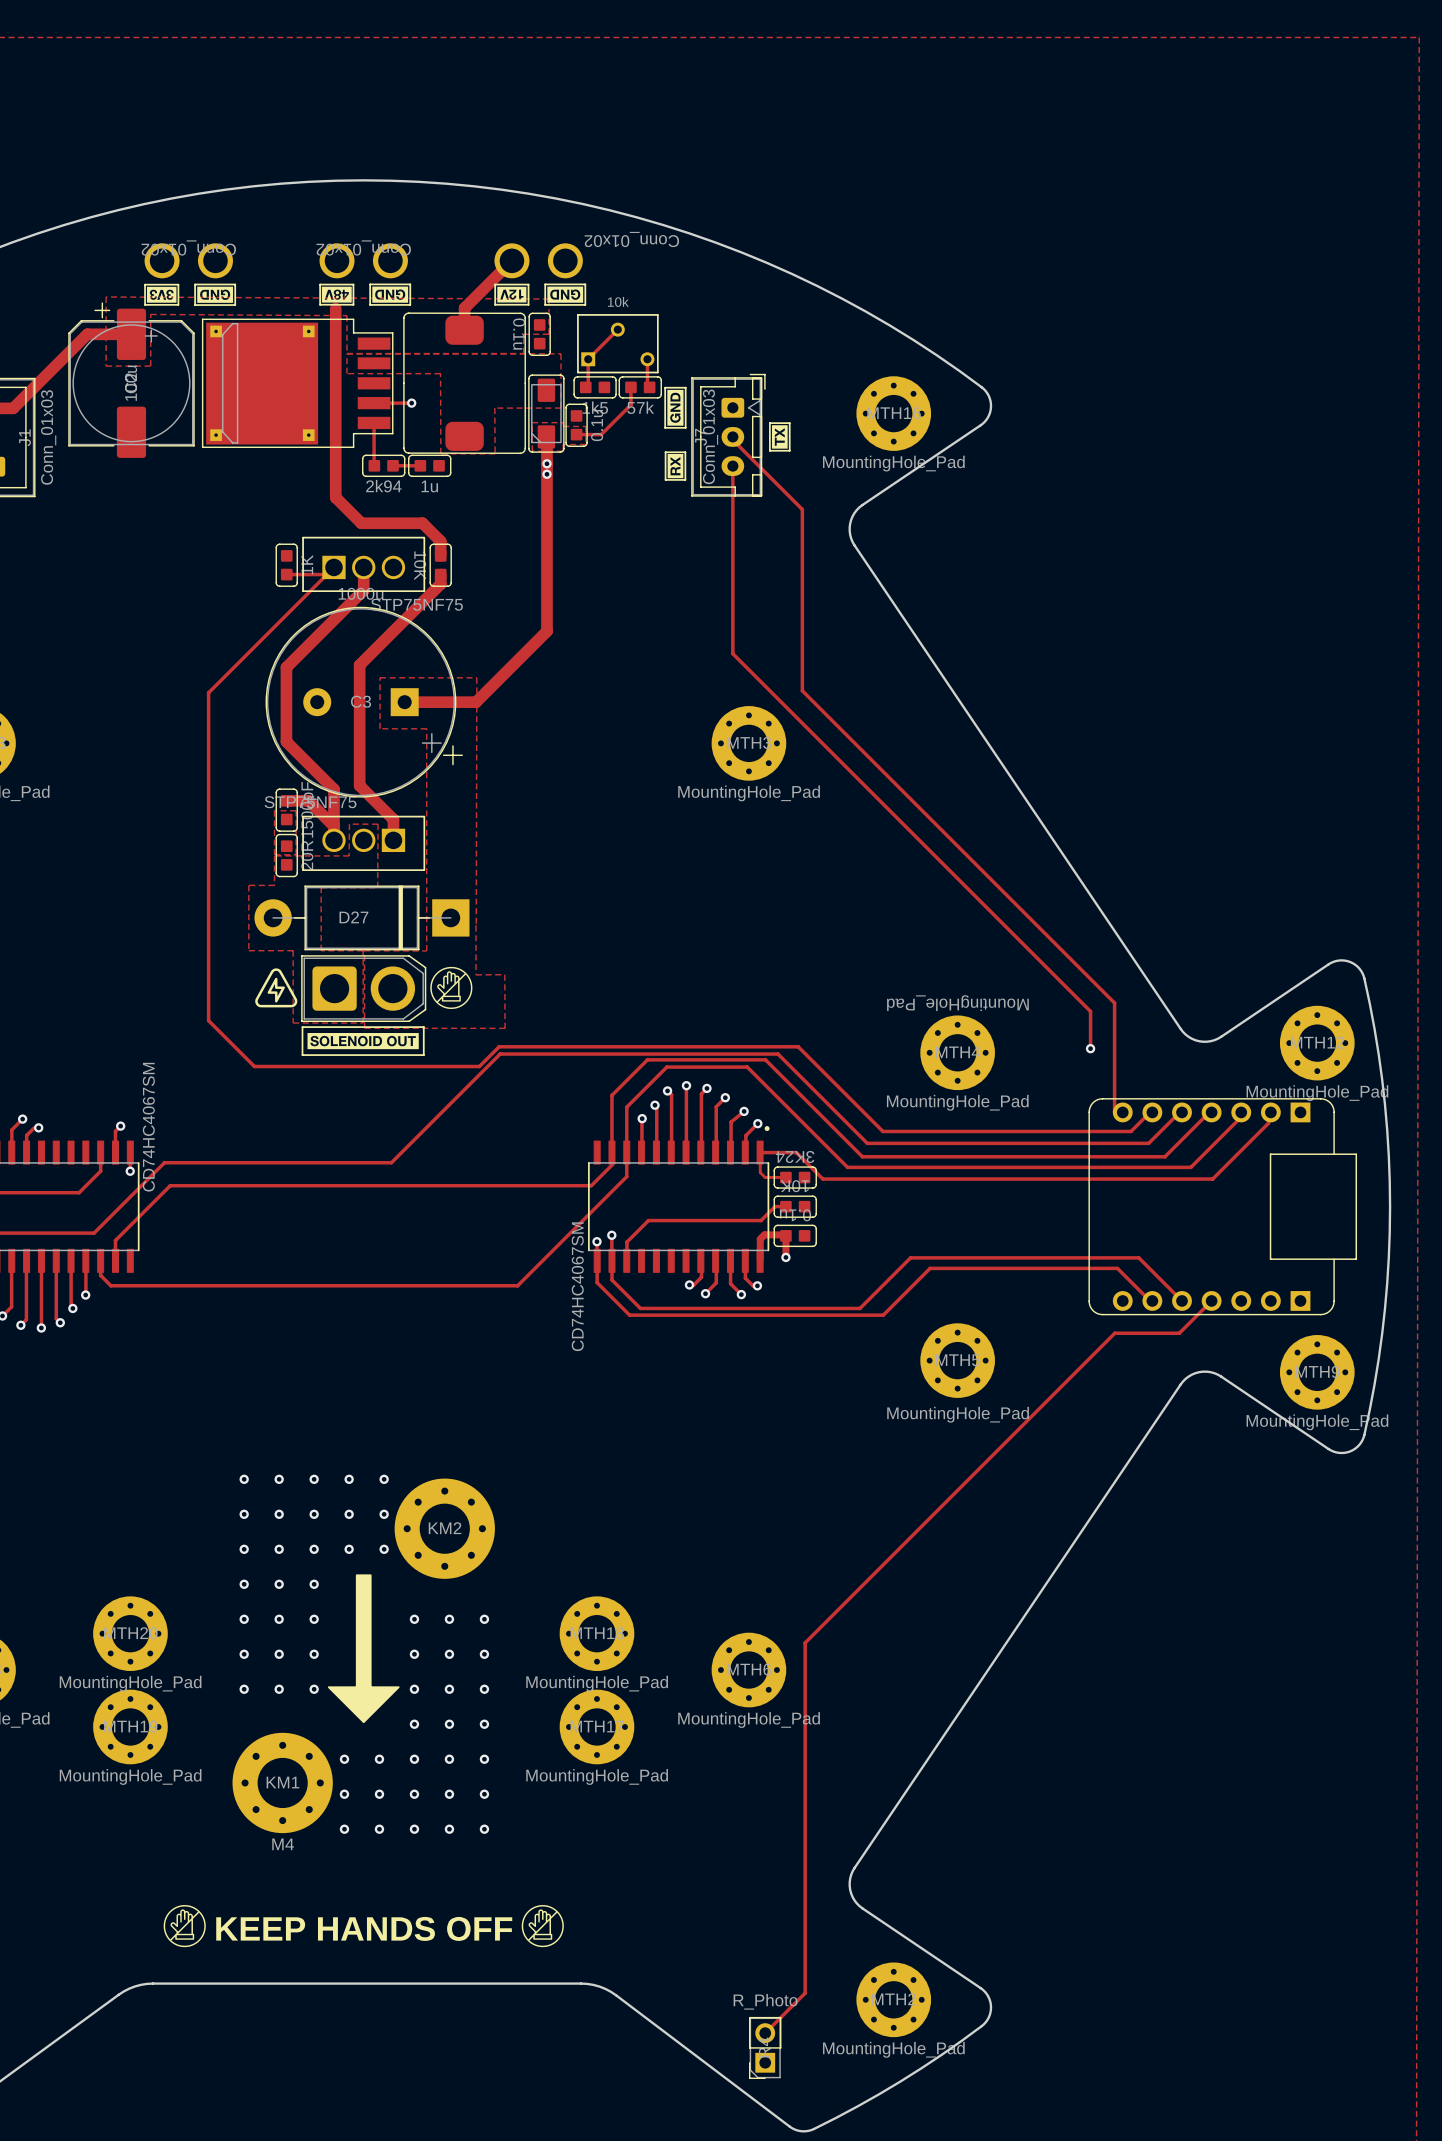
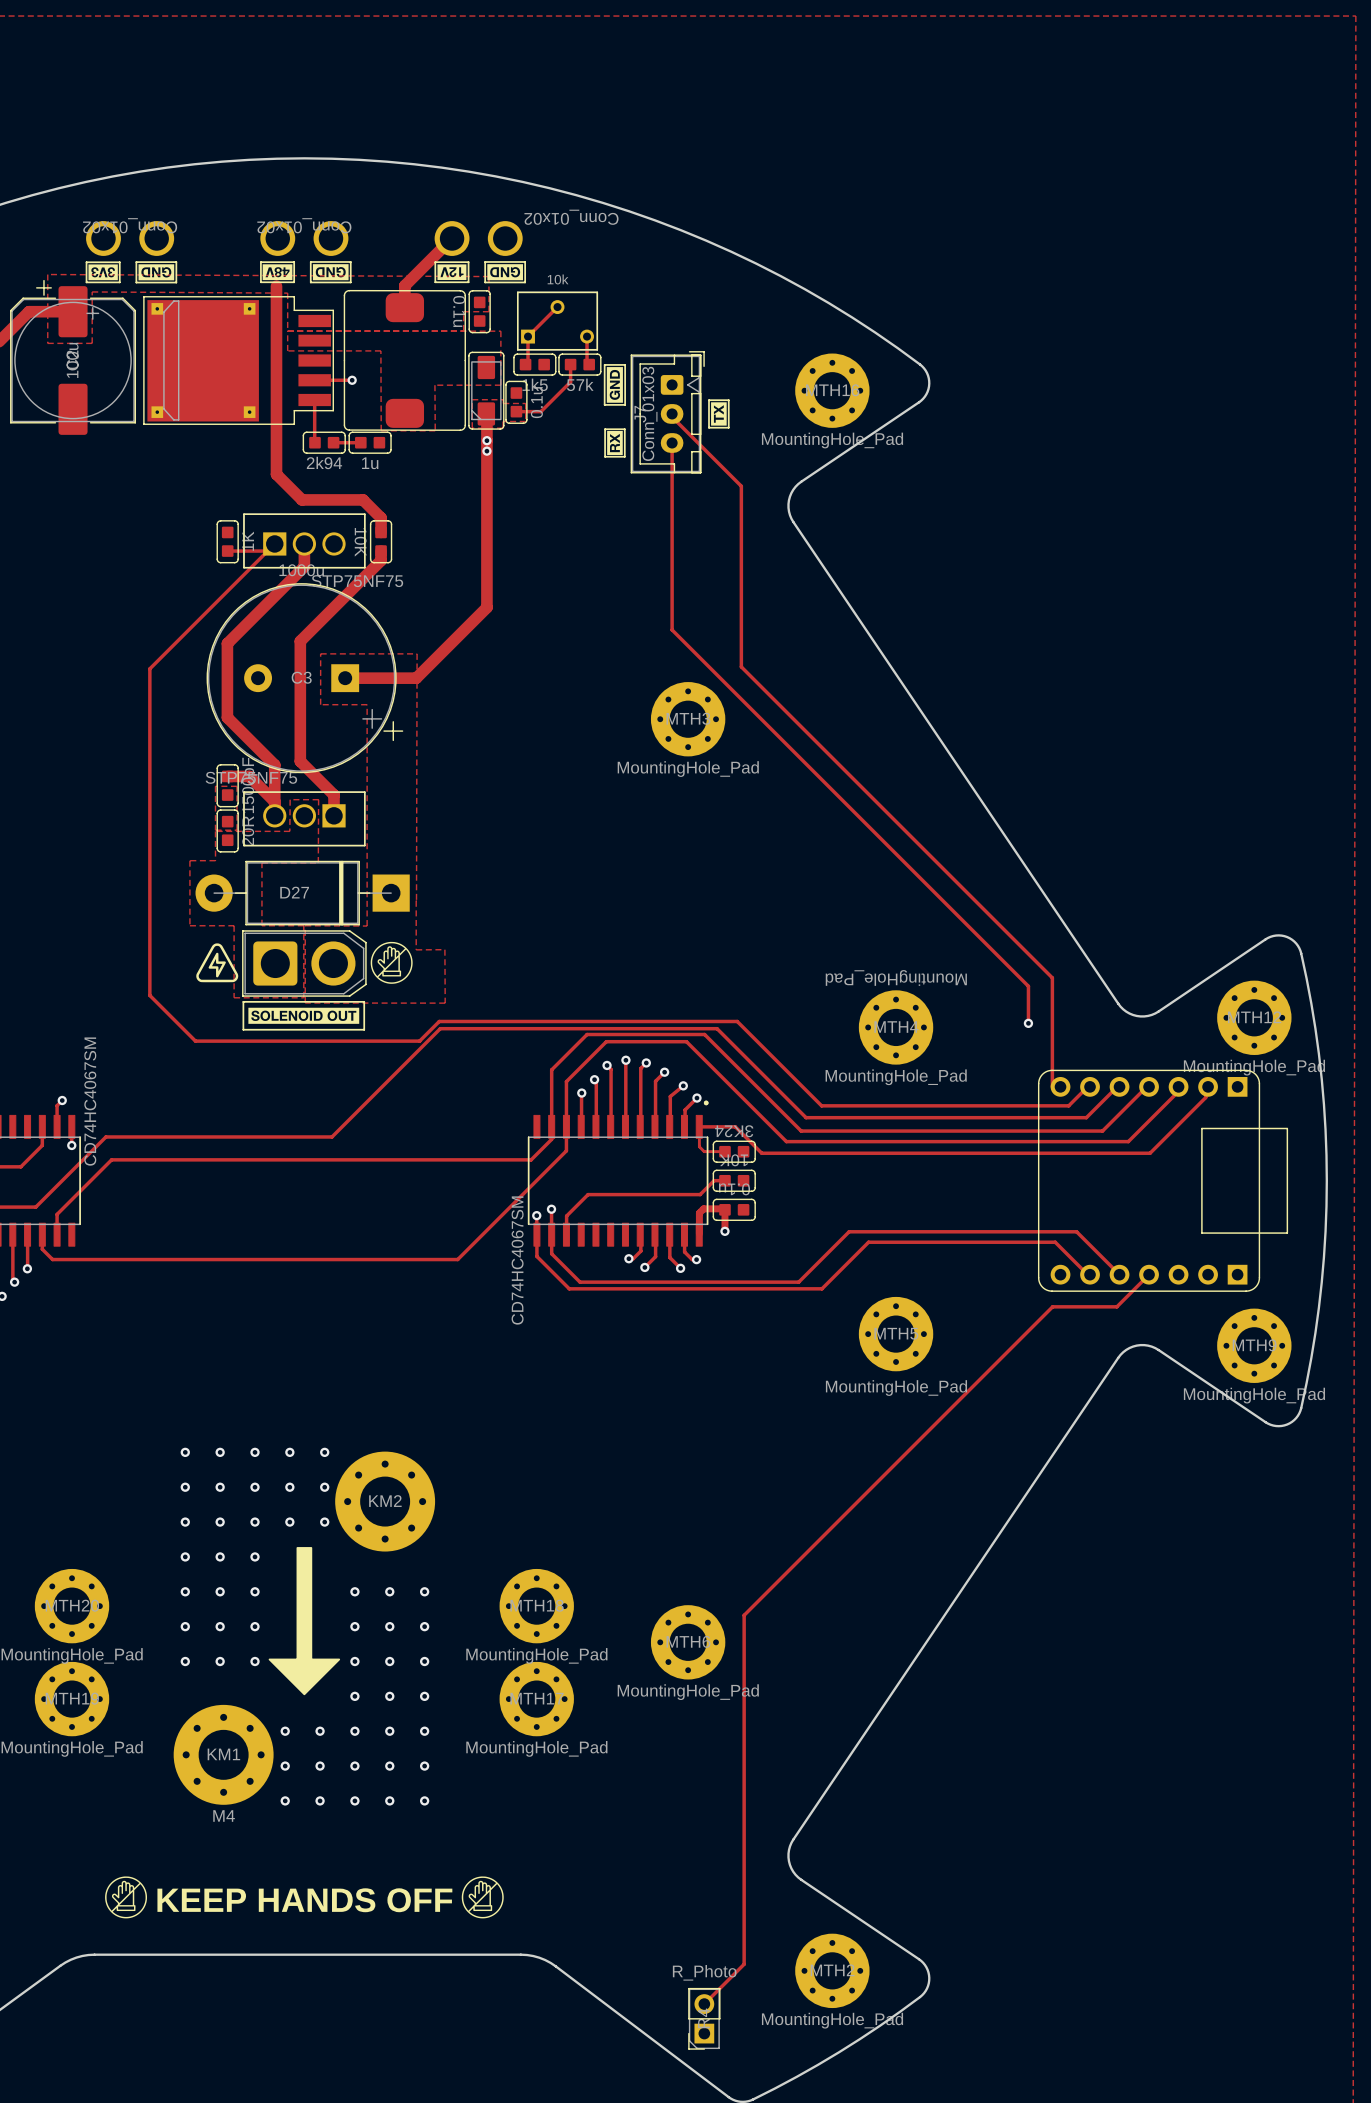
part footprint: [1088, 1098, 1358, 1316] -> [1038, 1069, 1289, 1292]

